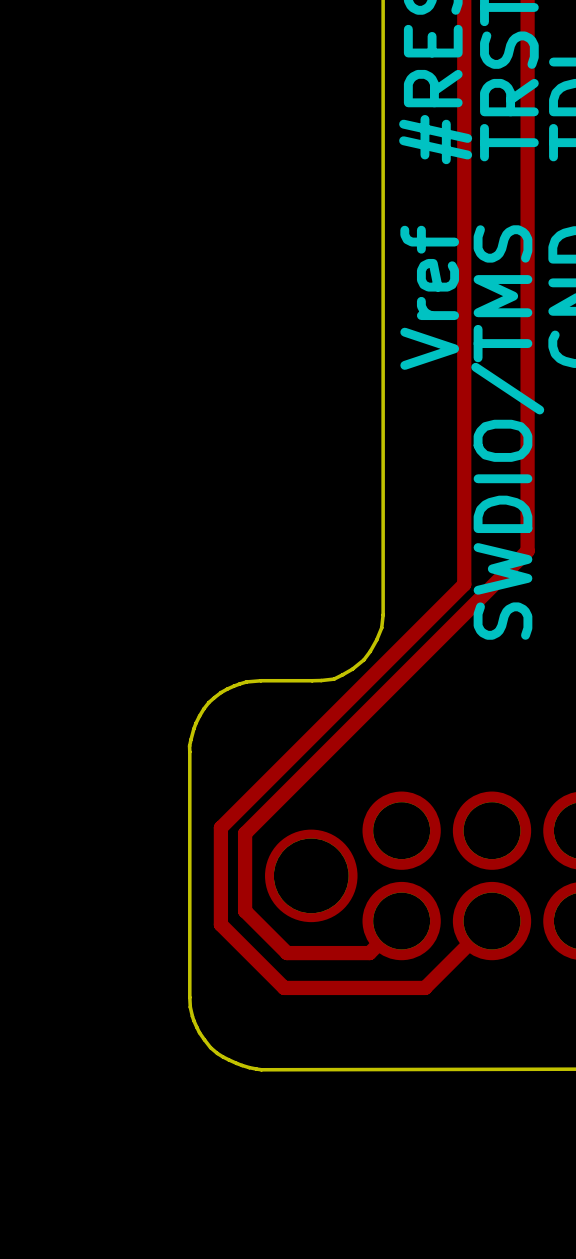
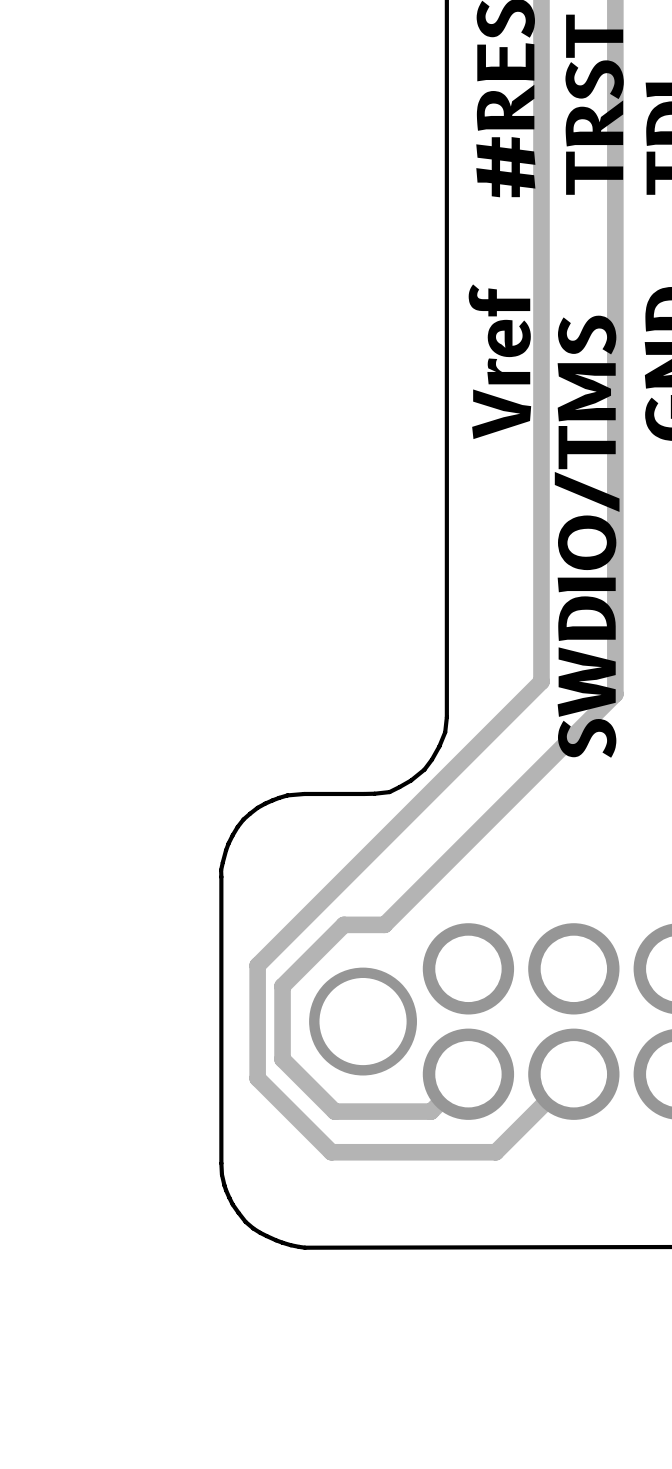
track: (527, 551) (245, 833) (245, 911) -> (615, 642) (615, 694) (384, 924) (343, 924) (282, 986) (282, 1059) (285, 1062)

